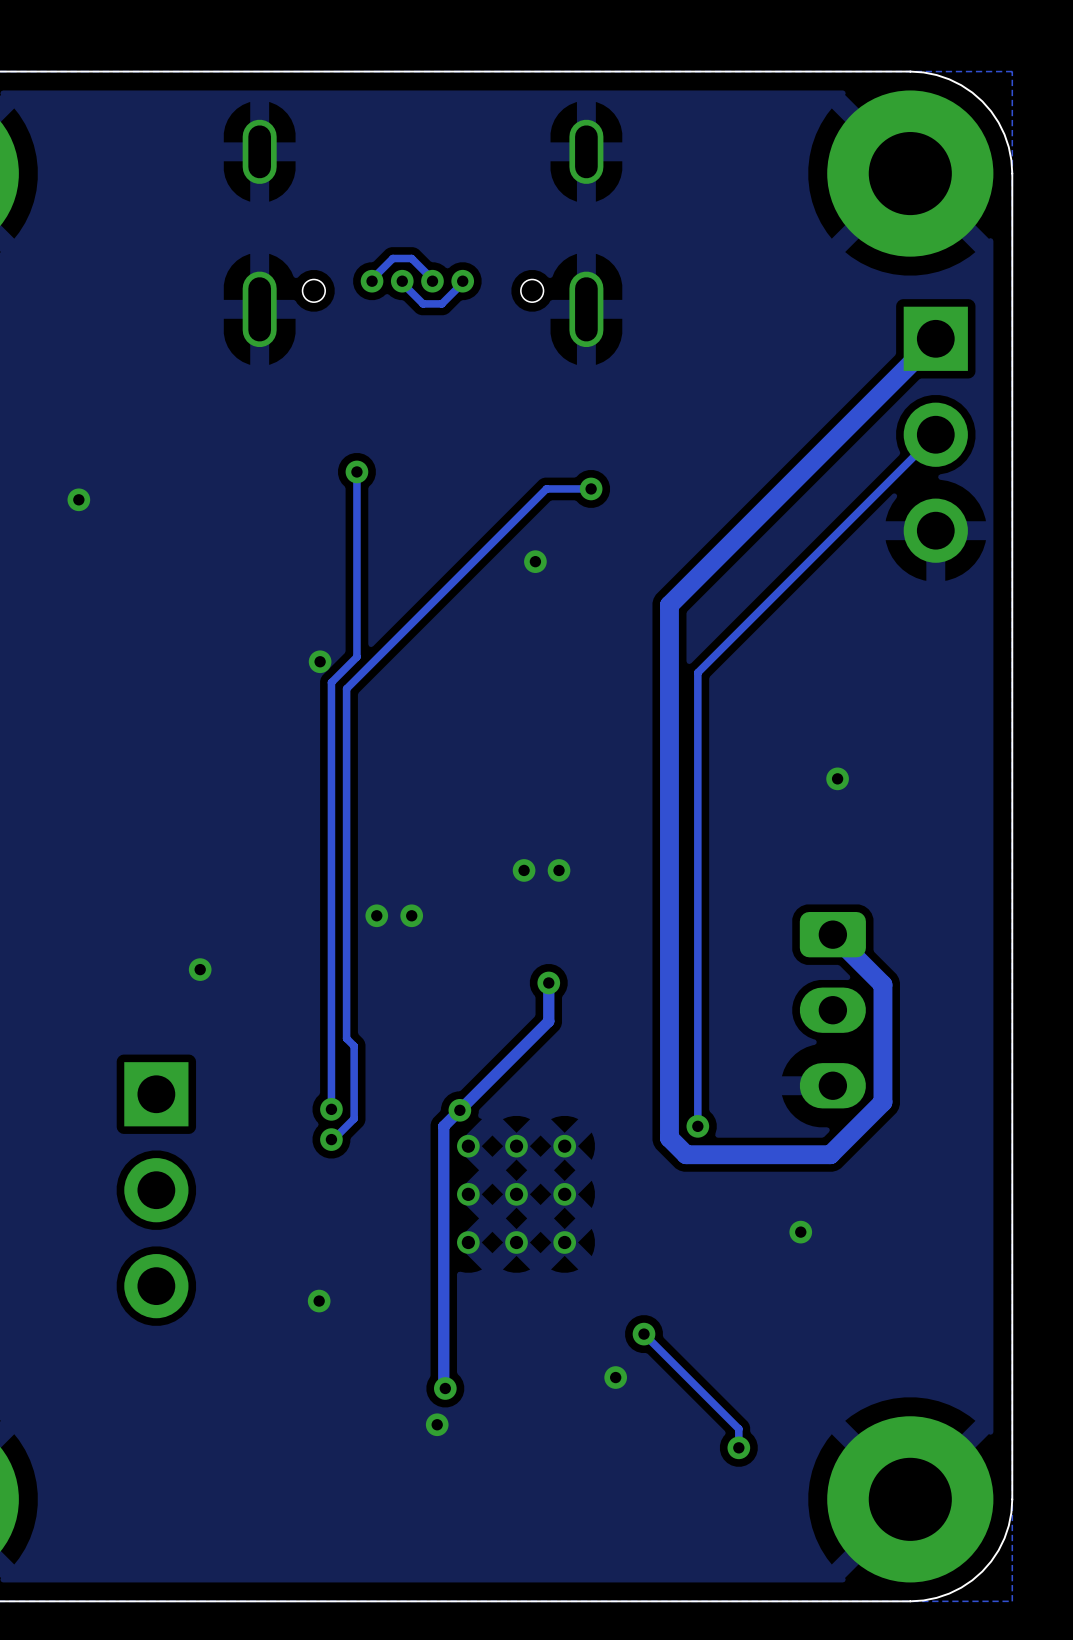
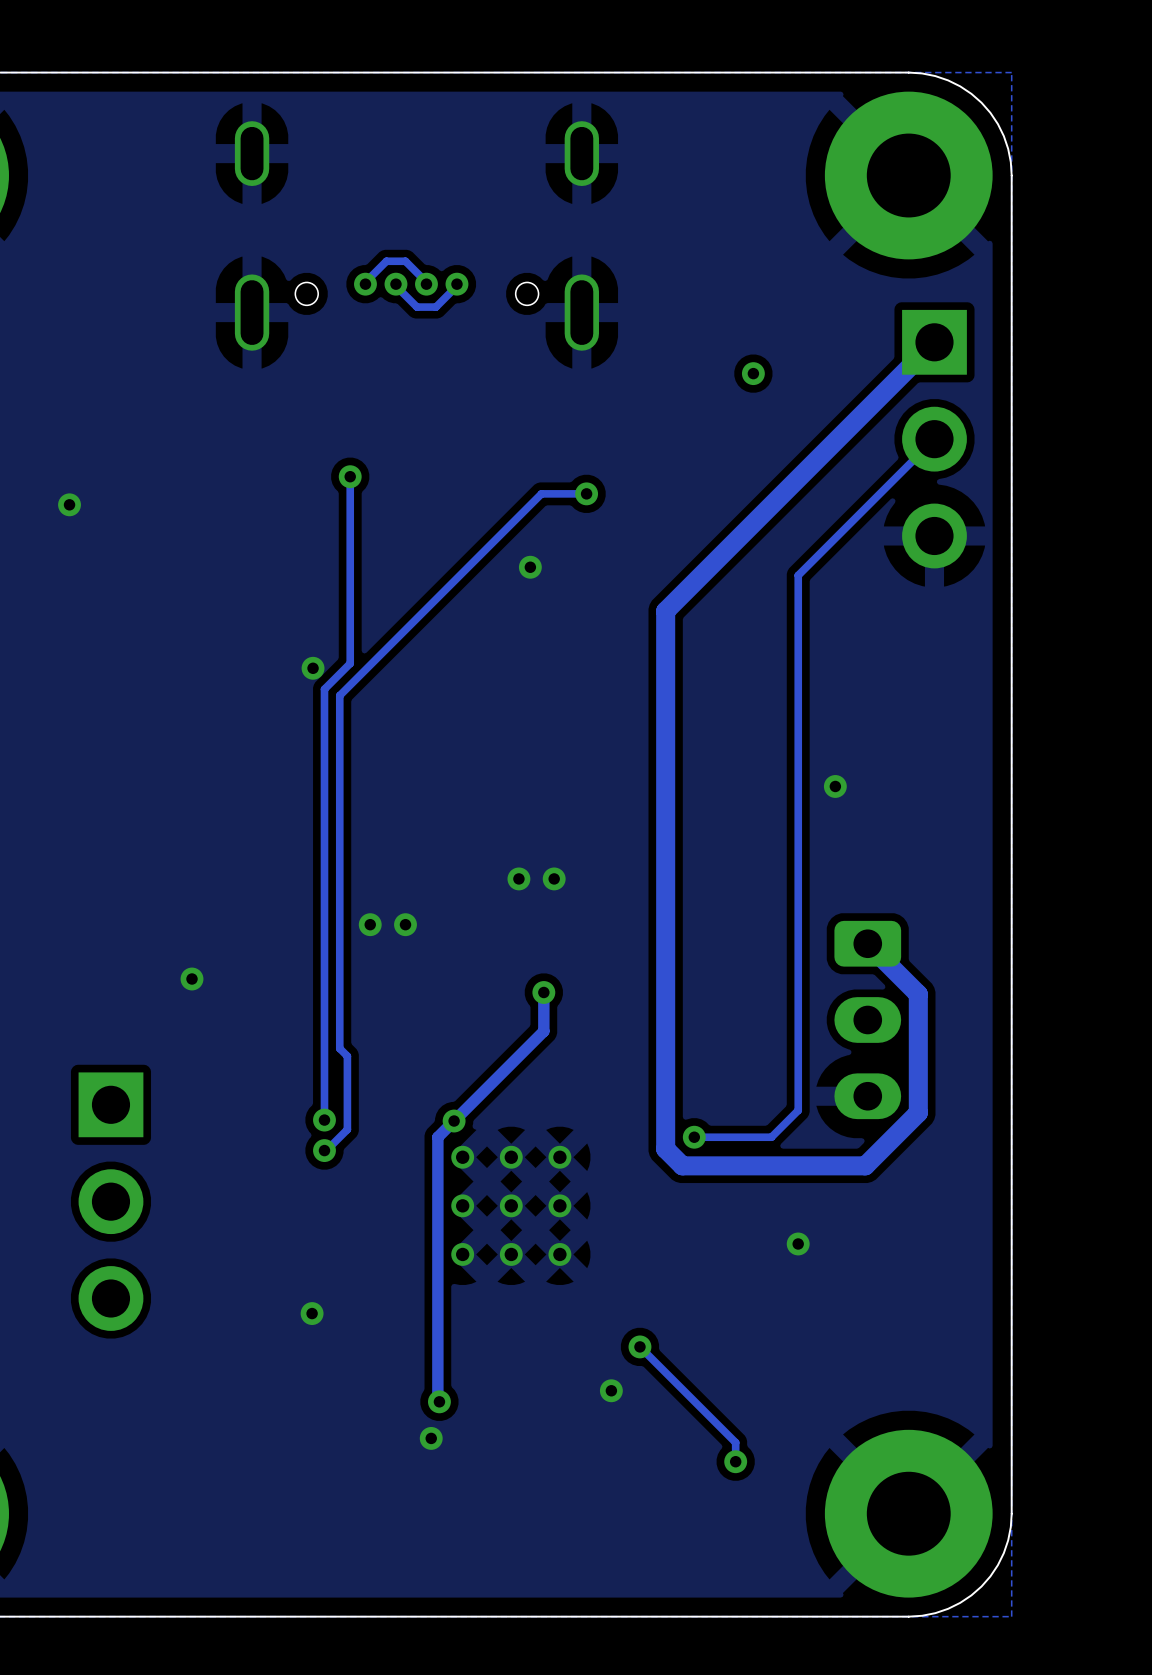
via: none -> (753, 373)
track: (800, 569) (697, 672) (697, 1126) -> (798, 575) (798, 1110) (771, 1137) (694, 1137)
track: (832, 934) (882, 984) (882, 1102) (830, 1154) -> (867, 943) (918, 994) (918, 1112) (865, 1165) (828, 1165)
part position: (832, 1010) -> (867, 1019)
part position: (156, 1190) -> (110, 1201)

